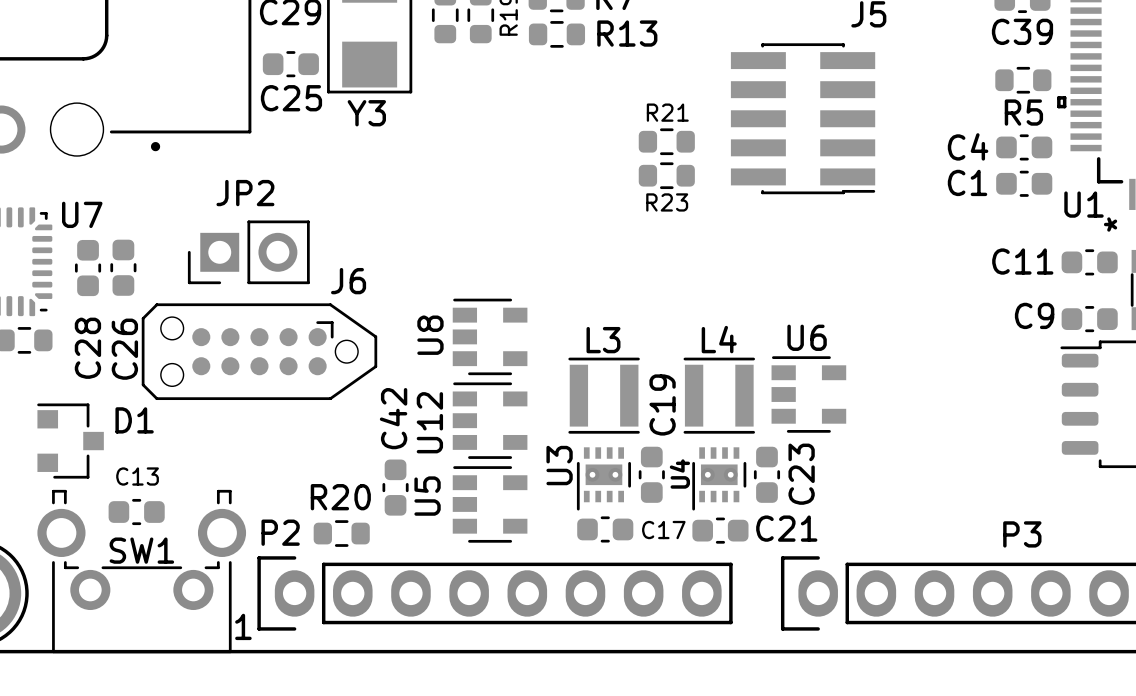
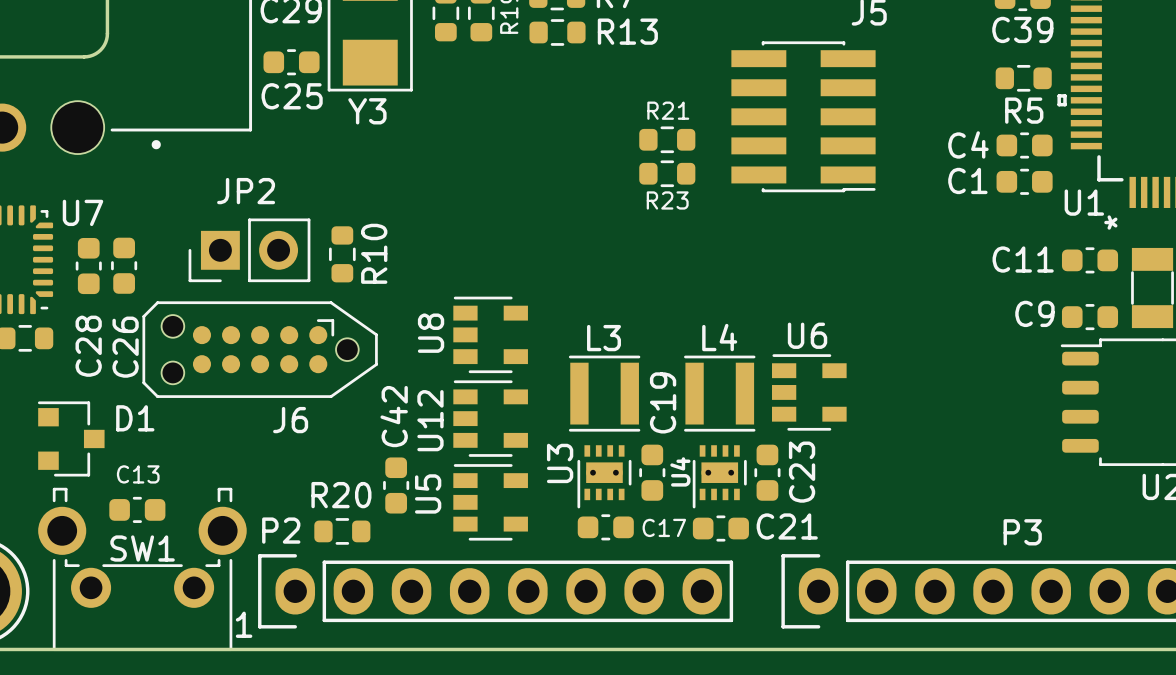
R10: none -> (342, 254)
J6 name position: J6 (348, 281) -> J6 (290, 420)

